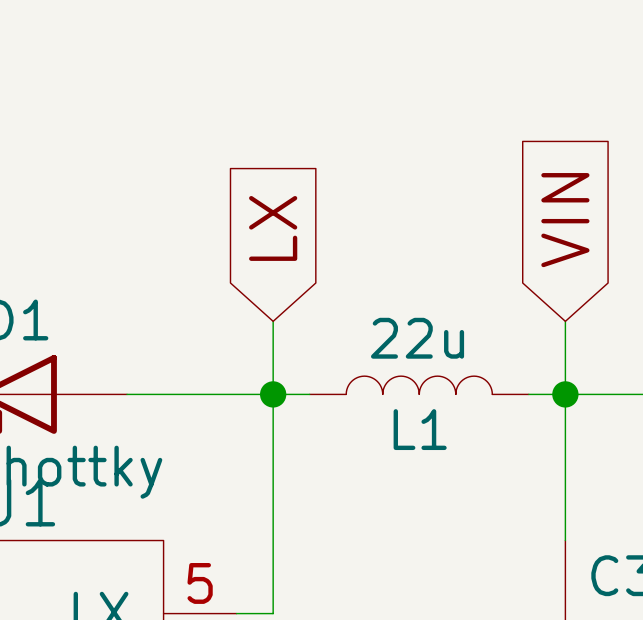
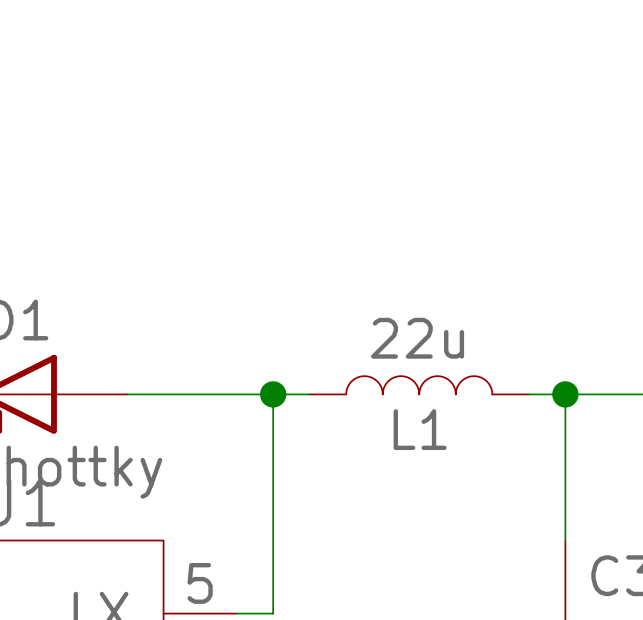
global label: VIN (565, 220) -> none
global label: LX (273, 228) -> none
wire: (273, 321) (273, 394) -> none
wire: (565, 321) (565, 394) -> none

